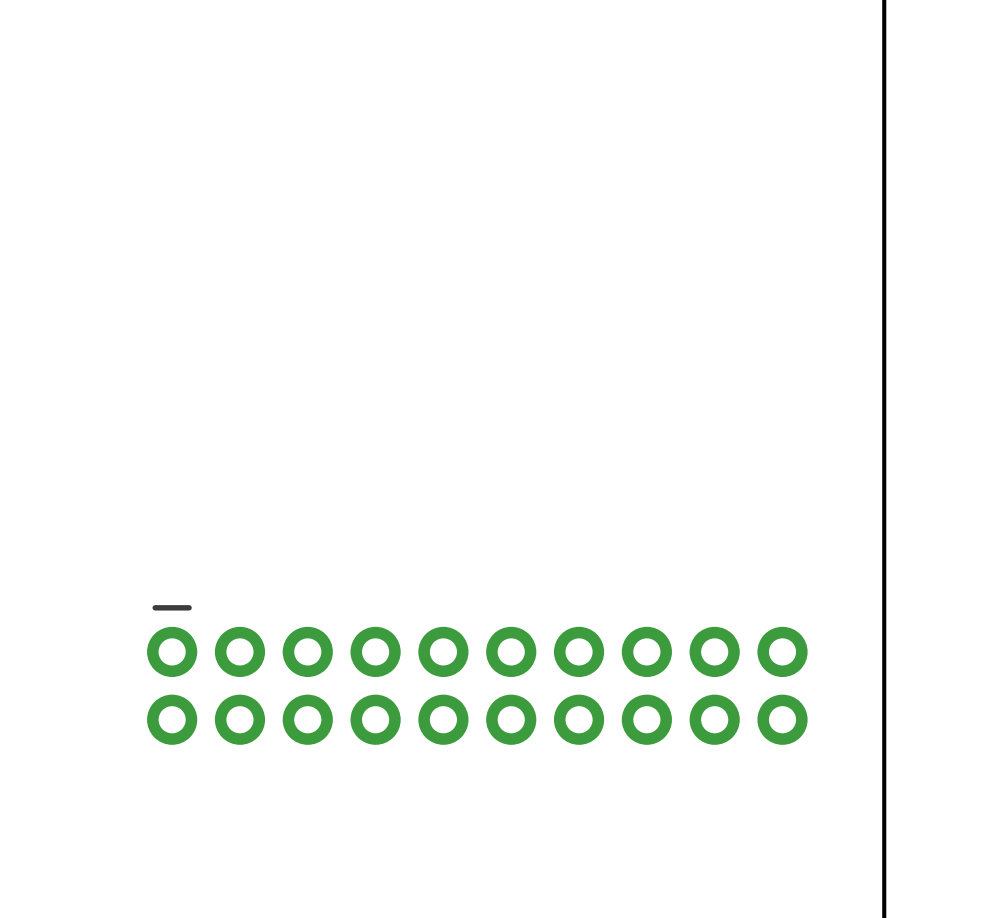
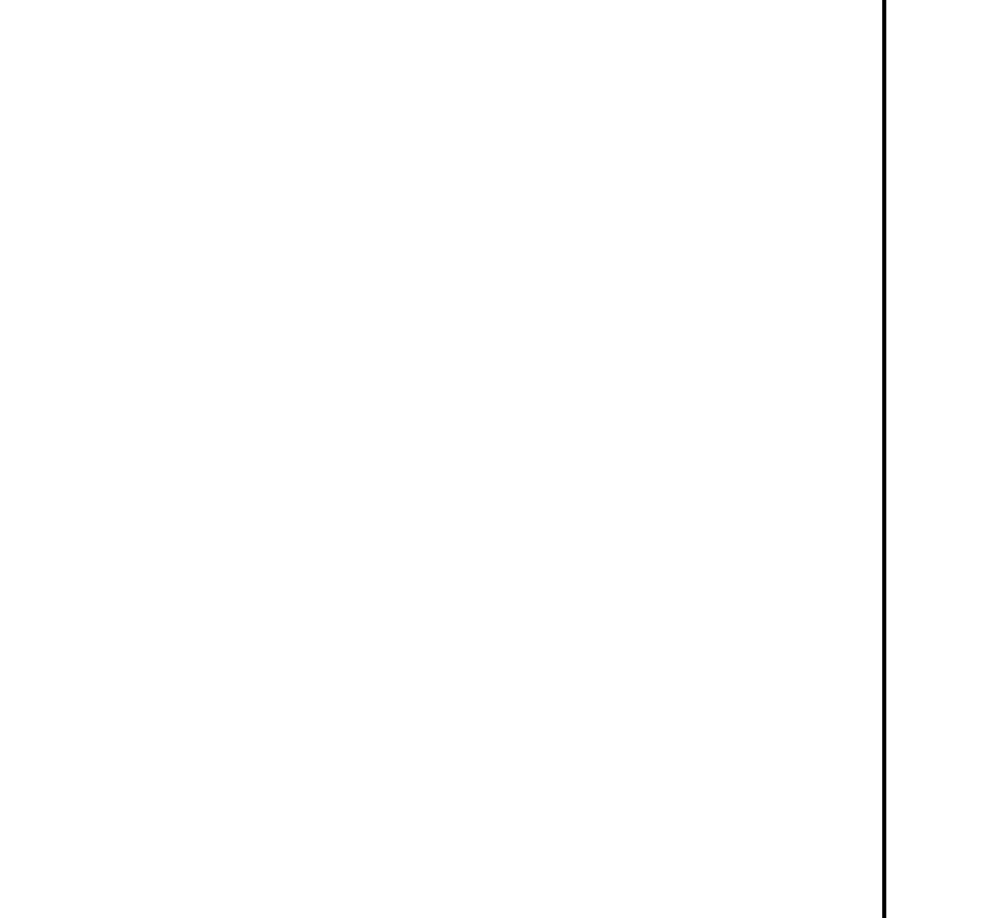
part: (477, 674) -> none

